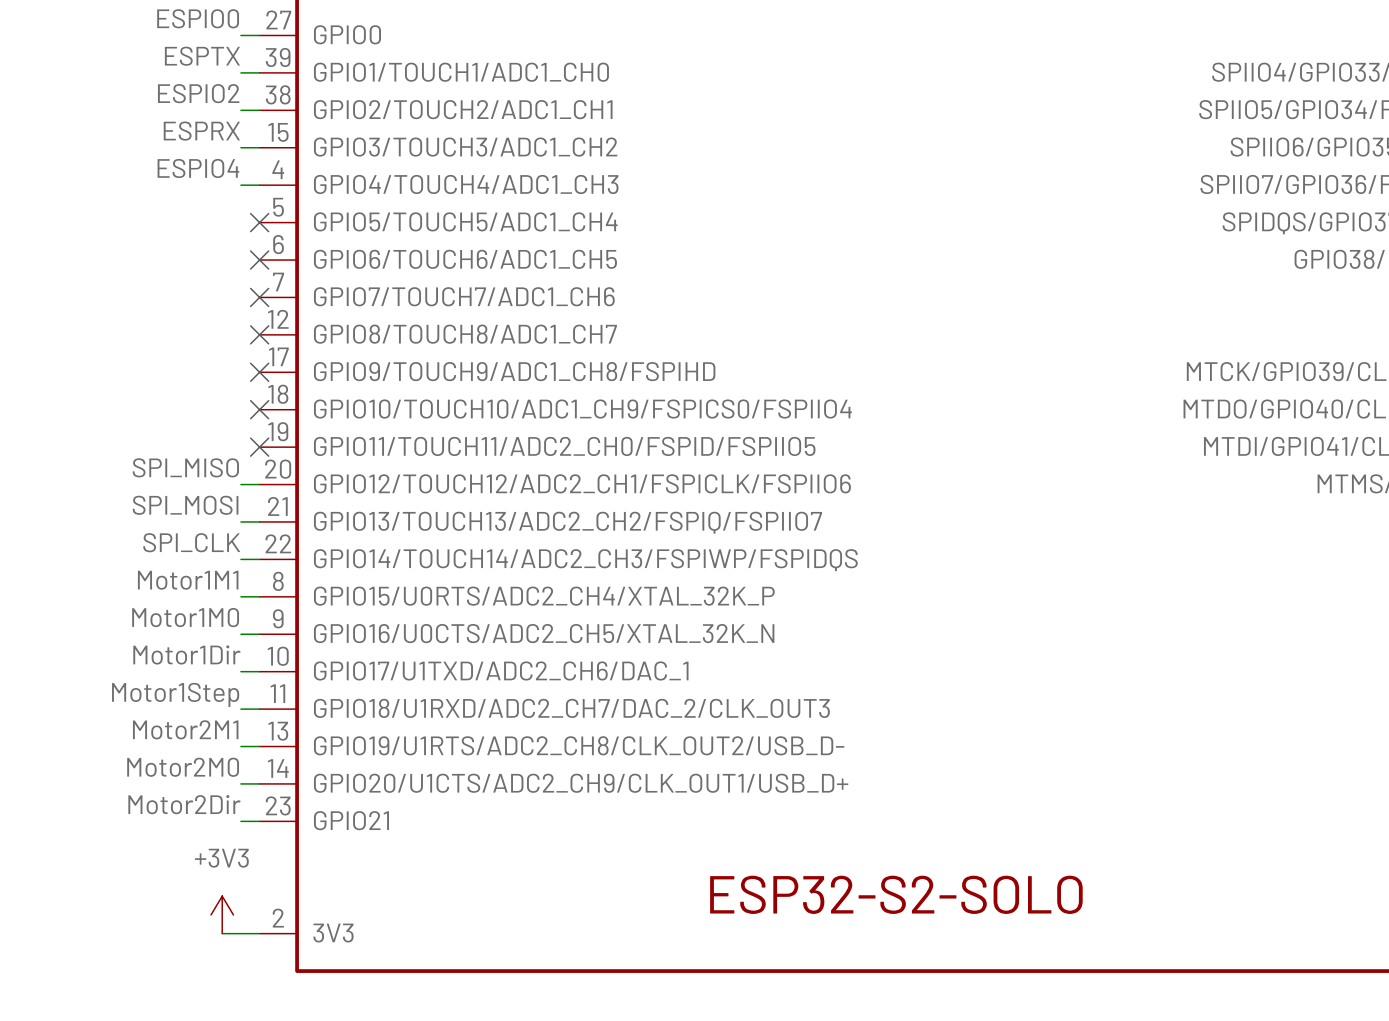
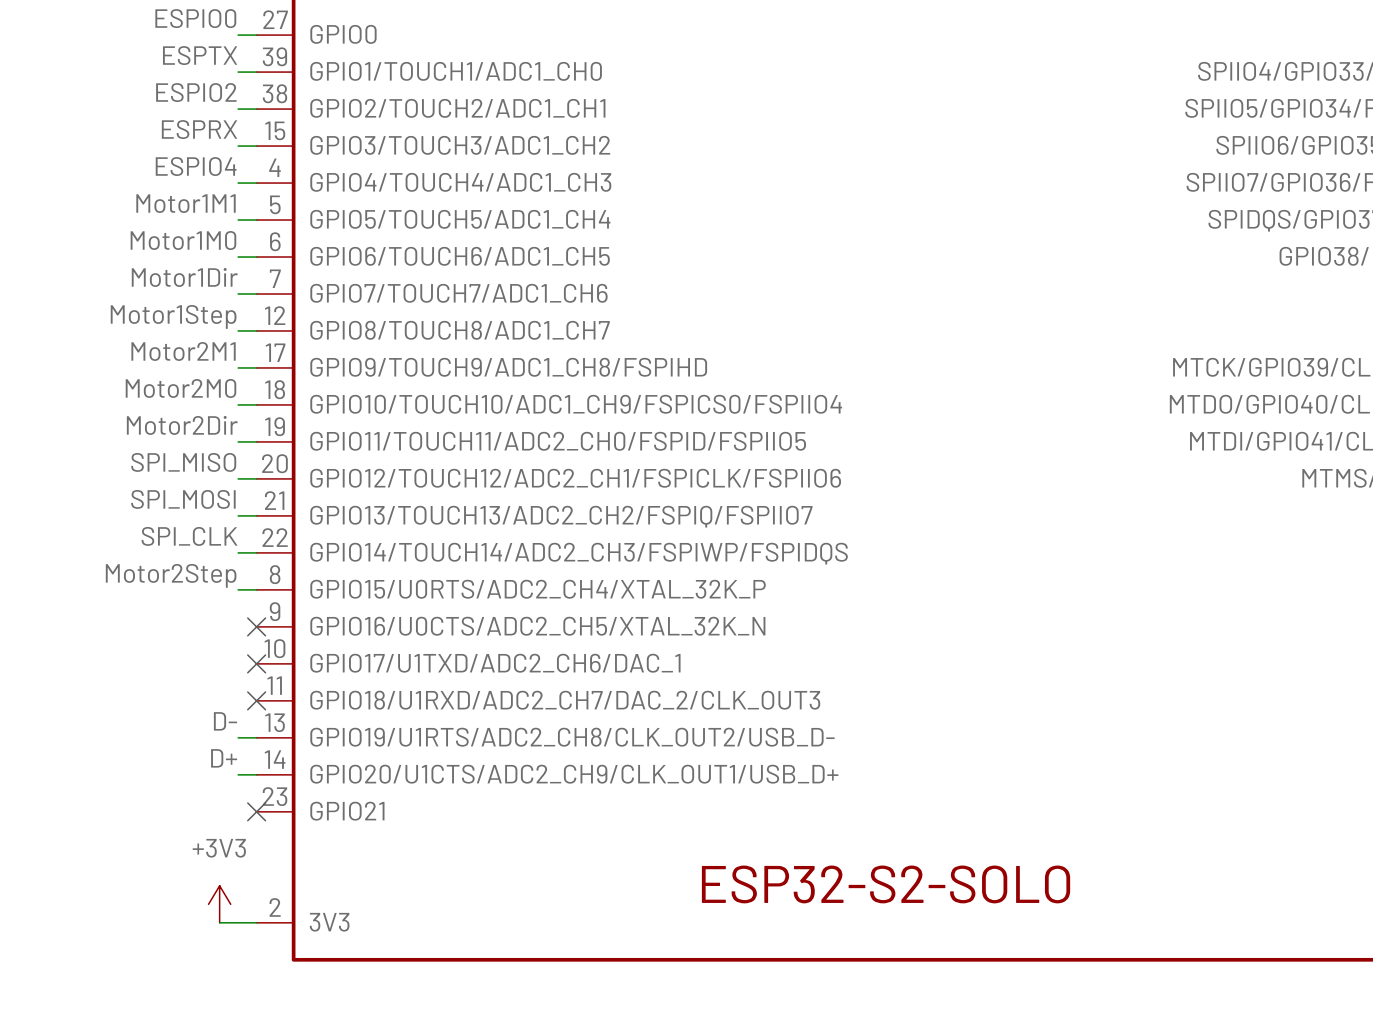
label: none -> Motor1M1 (186, 203)
wire: none -> (238, 220) (256, 220)
no-connect mark: (259, 222) -> none
label: none -> Motor1M0 (183, 240)
wire: none -> (238, 257) (256, 257)
no-connect mark: (259, 260) -> none
label: none -> Motor1Dir (184, 277)
wire: none -> (238, 294) (256, 294)
no-connect mark: (259, 297) -> none
label: none -> Motor1Step (173, 316)
wire: none -> (238, 330) (256, 330)
no-connect mark: (259, 334) -> none
label: none -> Motor2M1 (183, 351)
no-connect mark: (259, 372) -> none
label: none -> Motor2M0 (180, 388)
no-connect mark: (259, 409) -> none
label: none -> Motor2Dir (182, 425)
no-connect mark: (259, 447) -> none
label: Motor1M1 (188, 580) -> Motor2Step (171, 575)
label: Motor1M0 (185, 617) -> none
wire: (240, 634) (259, 634) -> (238, 367) (256, 367)
no-connect mark: none -> (256, 626)
label: Motor1Dir (186, 654) -> none
wire: (240, 671) (259, 671) -> (238, 404) (256, 404)
no-connect mark: none -> (256, 663)
label: Motor1Step (175, 694) -> none
wire: (240, 709) (259, 709) -> (238, 441) (256, 441)
no-connect mark: none -> (256, 700)
label: Motor2M1 (185, 729) -> D- (225, 721)
label: Motor2M0 (183, 767) -> D+ (224, 758)
label: Motor2Dir (184, 804) -> none
wire: (240, 821) (259, 821) -> none
no-connect mark: none -> (256, 811)

